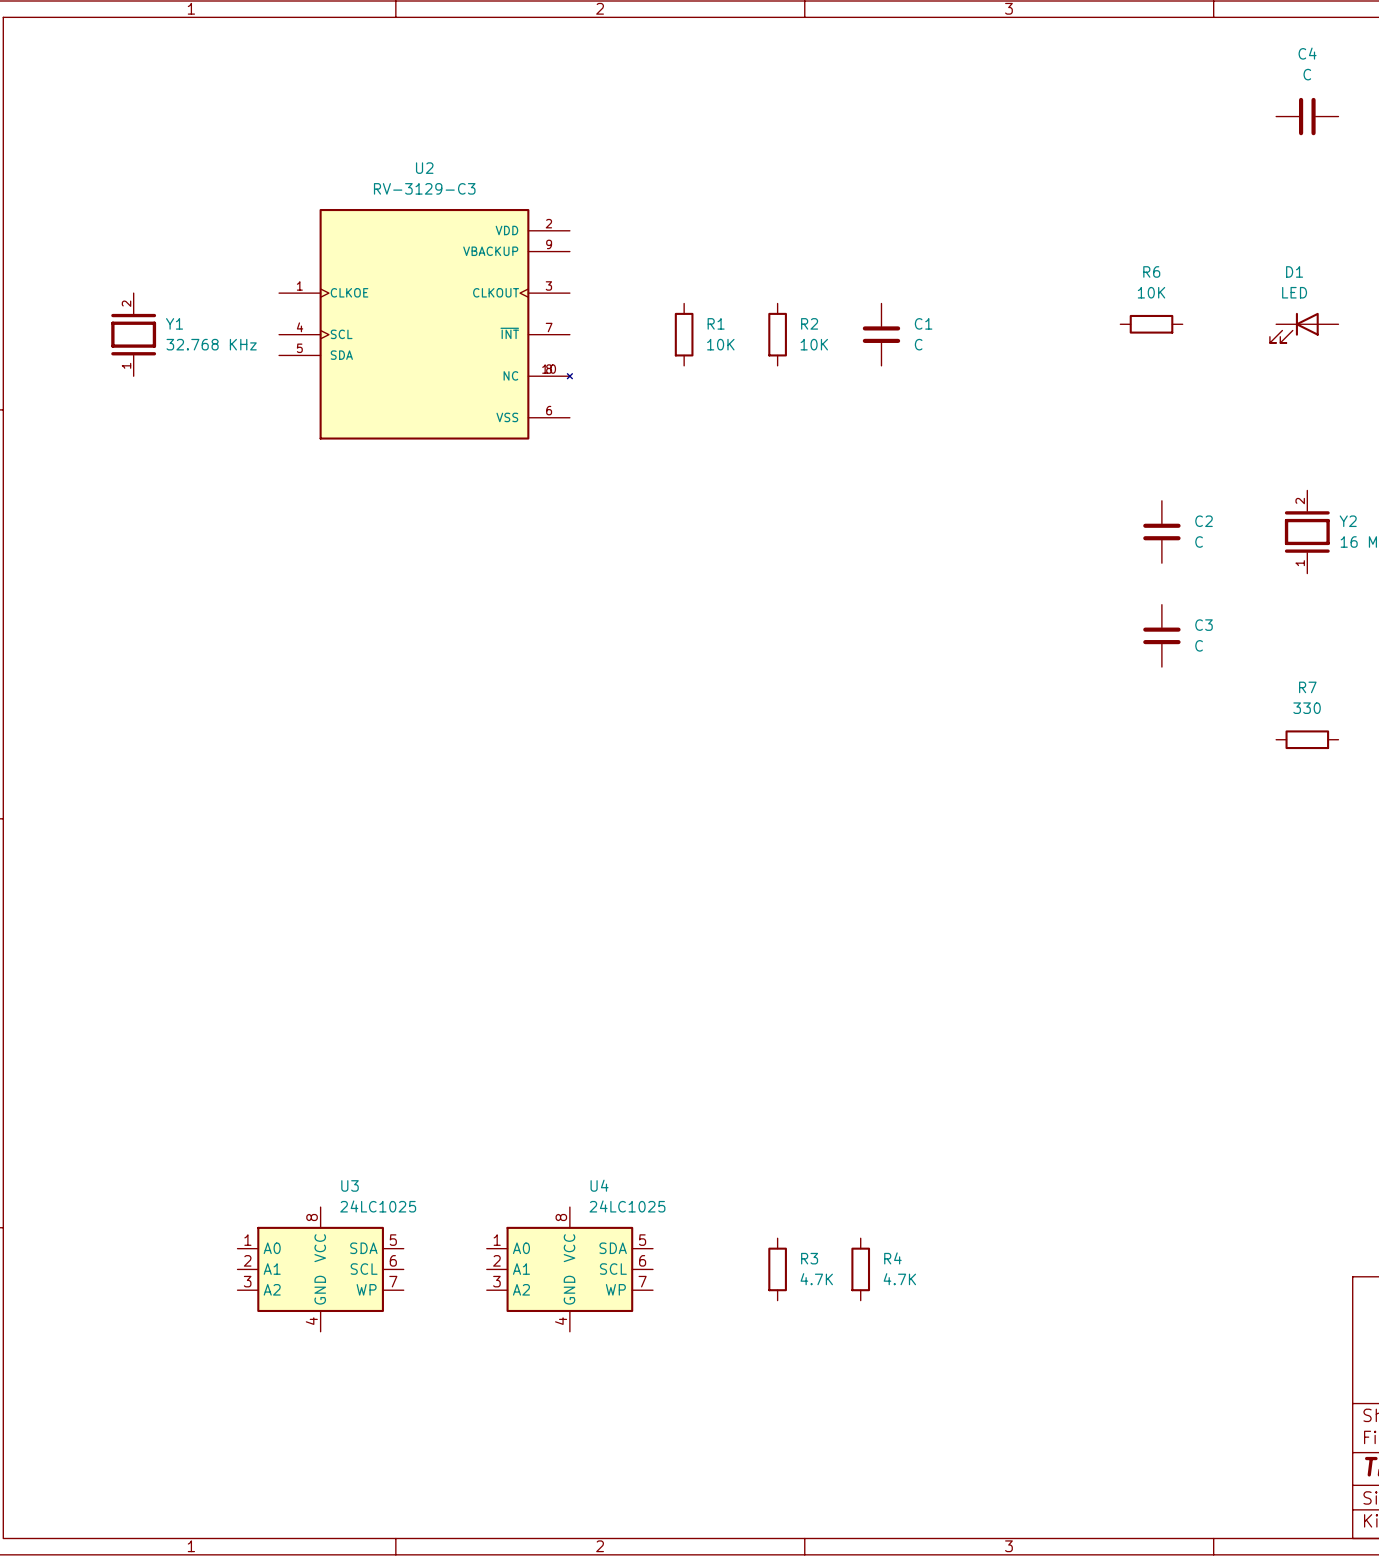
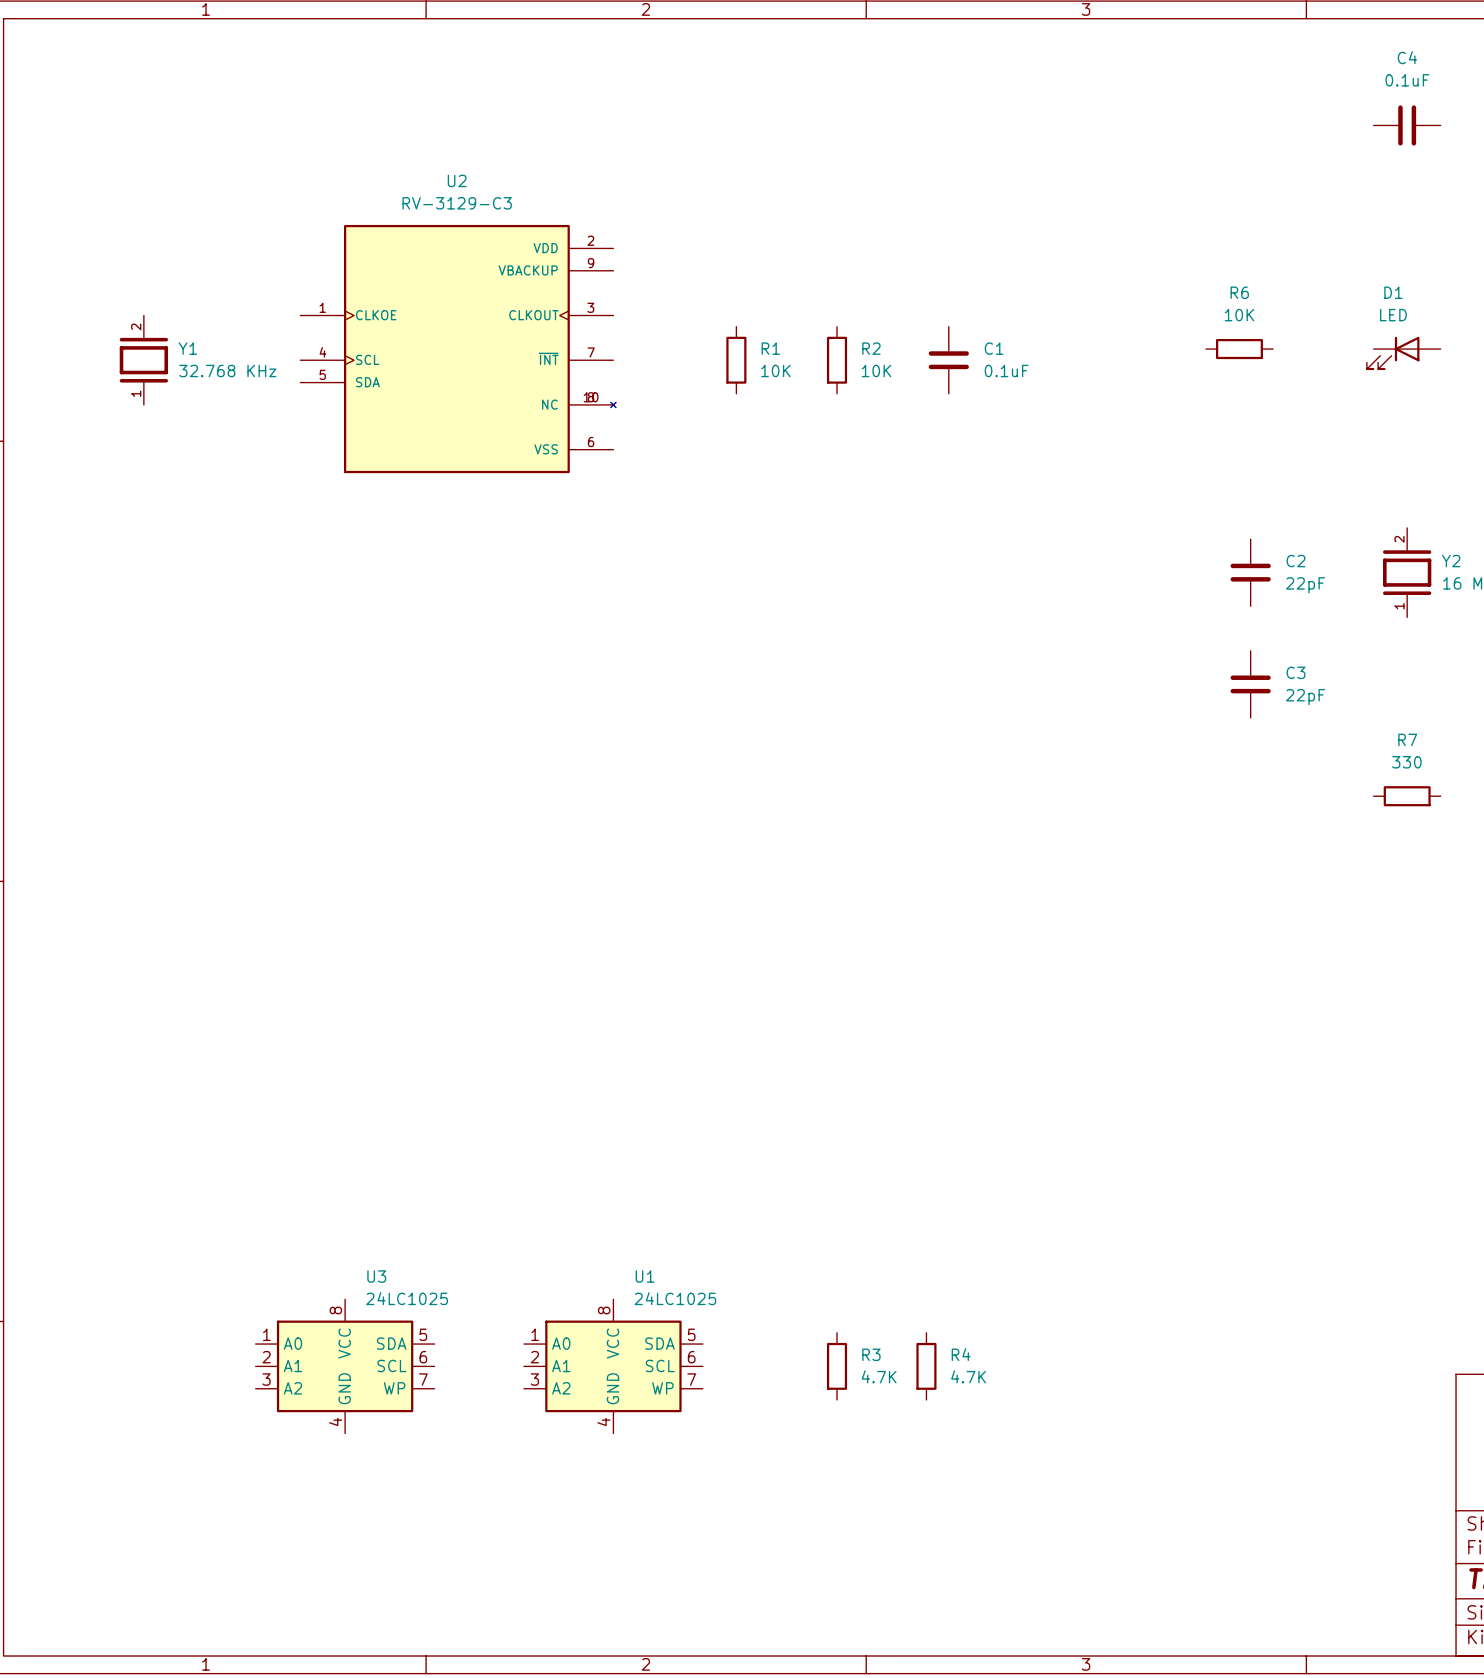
C4 value: C (1307, 74) -> 0.1uF (1407, 80)
C1 value: C (918, 344) -> 0.1uF (1006, 370)
C2 value: C (1199, 542) -> 22pF (1305, 585)
C3 value: C (1199, 645) -> 22pF (1305, 697)
U4 name: U4 (599, 1185) -> U1 (645, 1276)

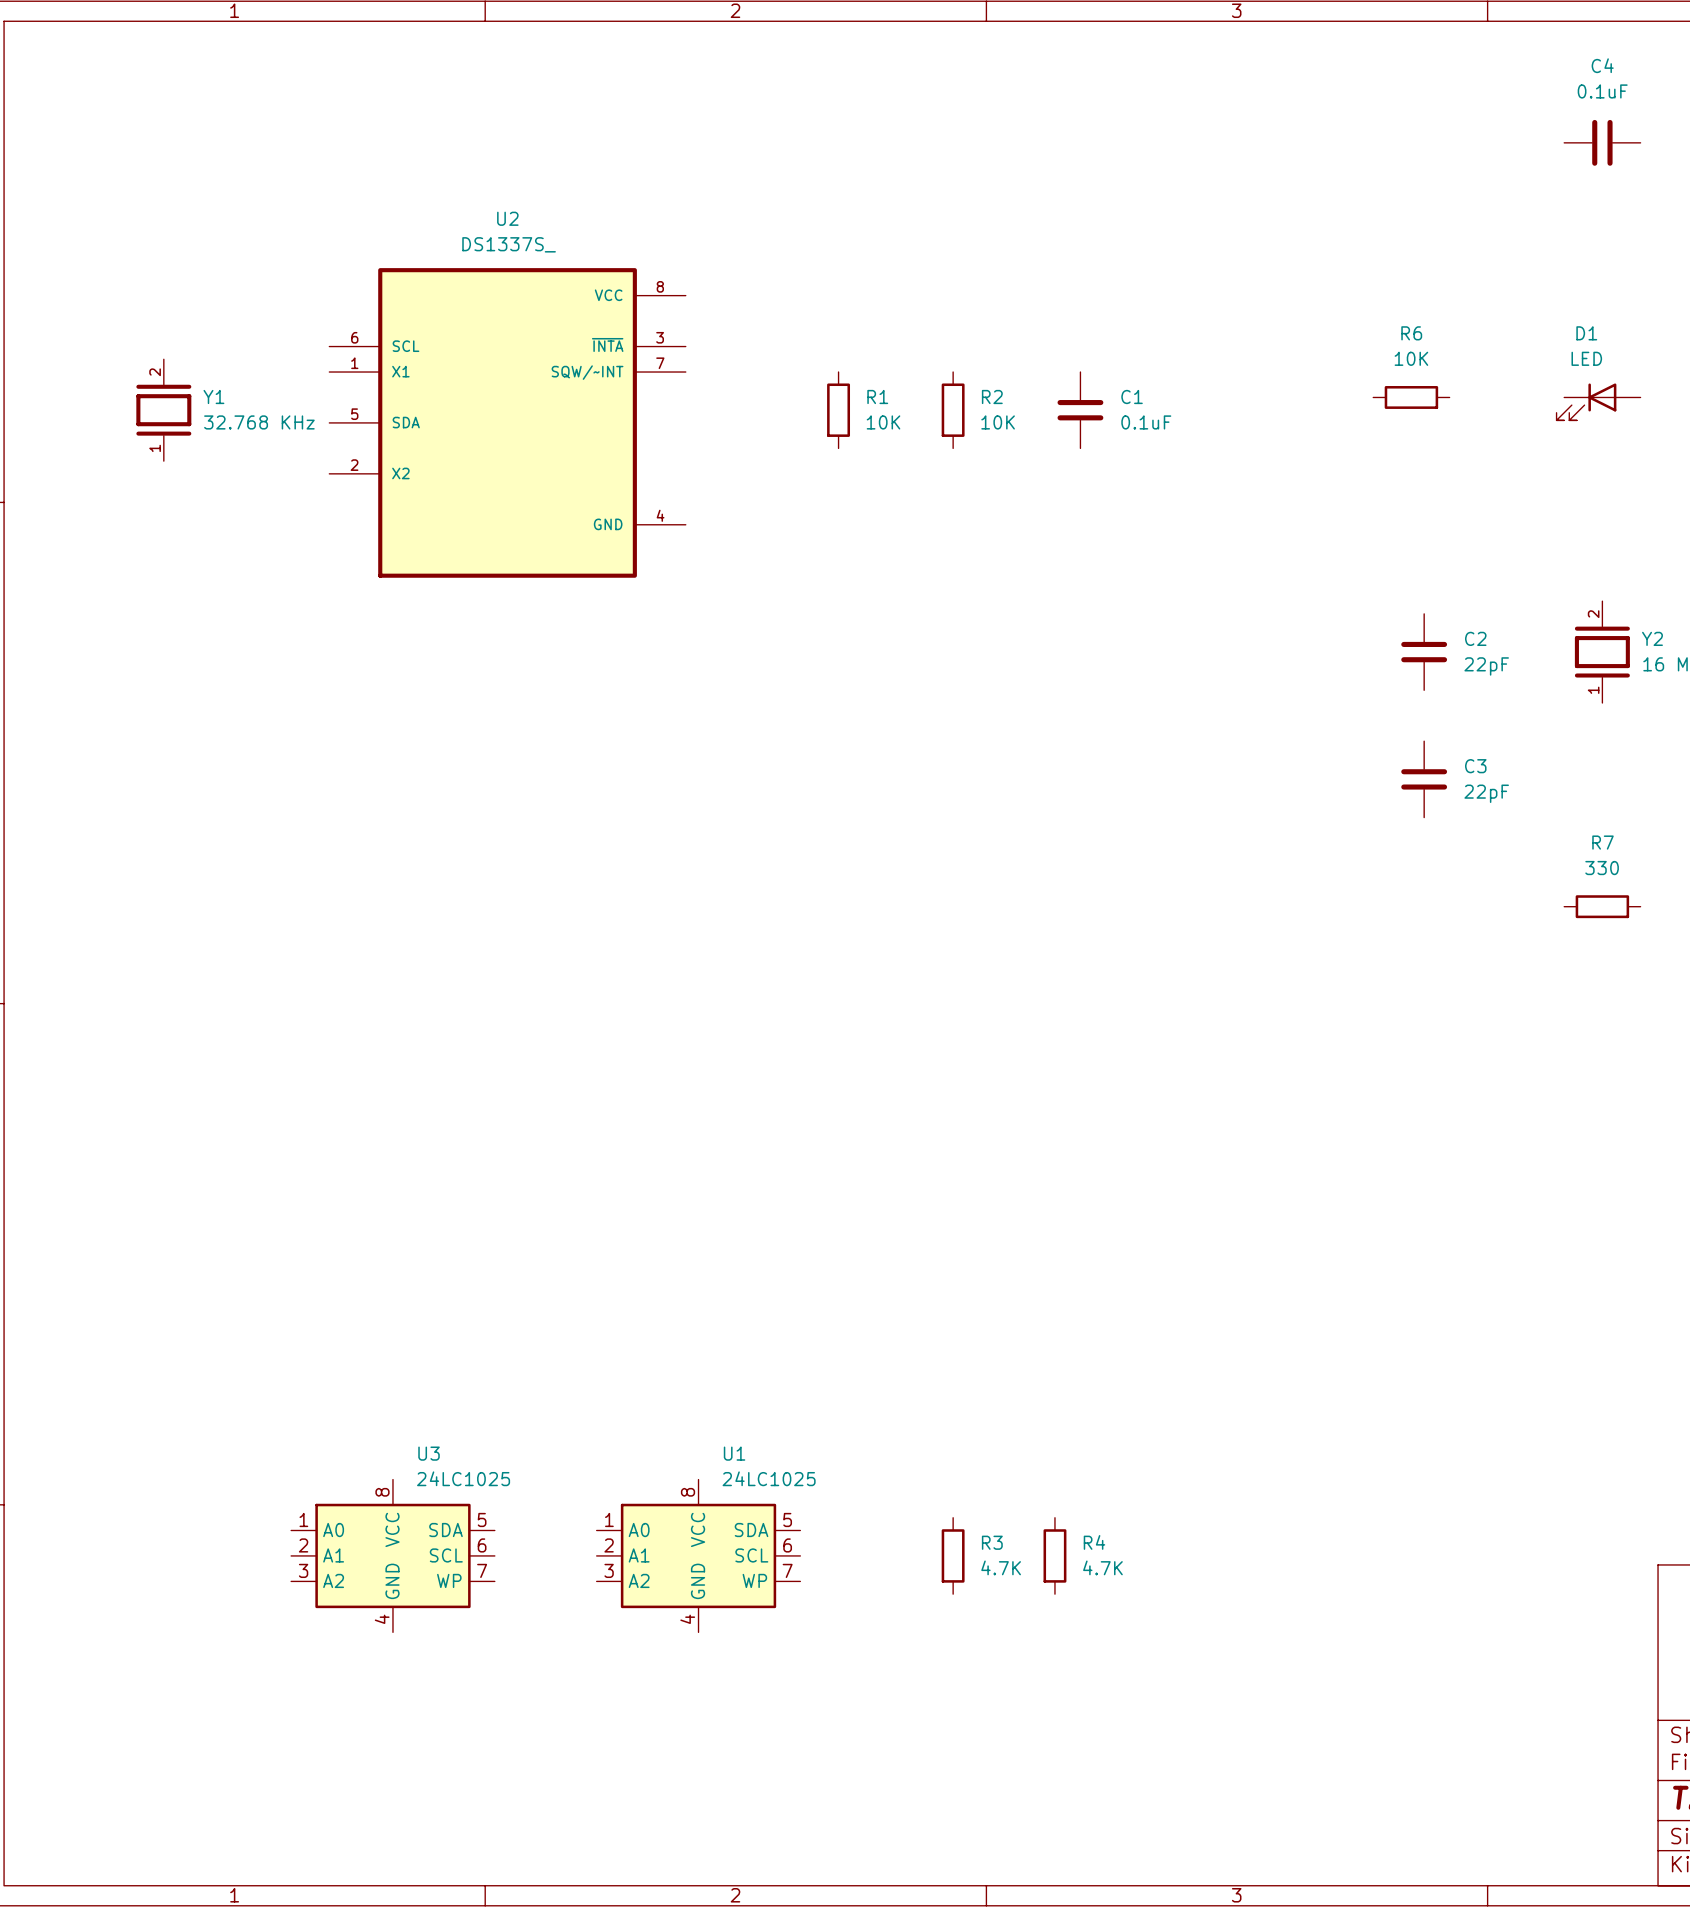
U2 value: RV-3129-C3 (457, 203) -> DS1337S_ (509, 244)
U2 symbol: [300, 224, 617, 474] -> [329, 268, 686, 578]

